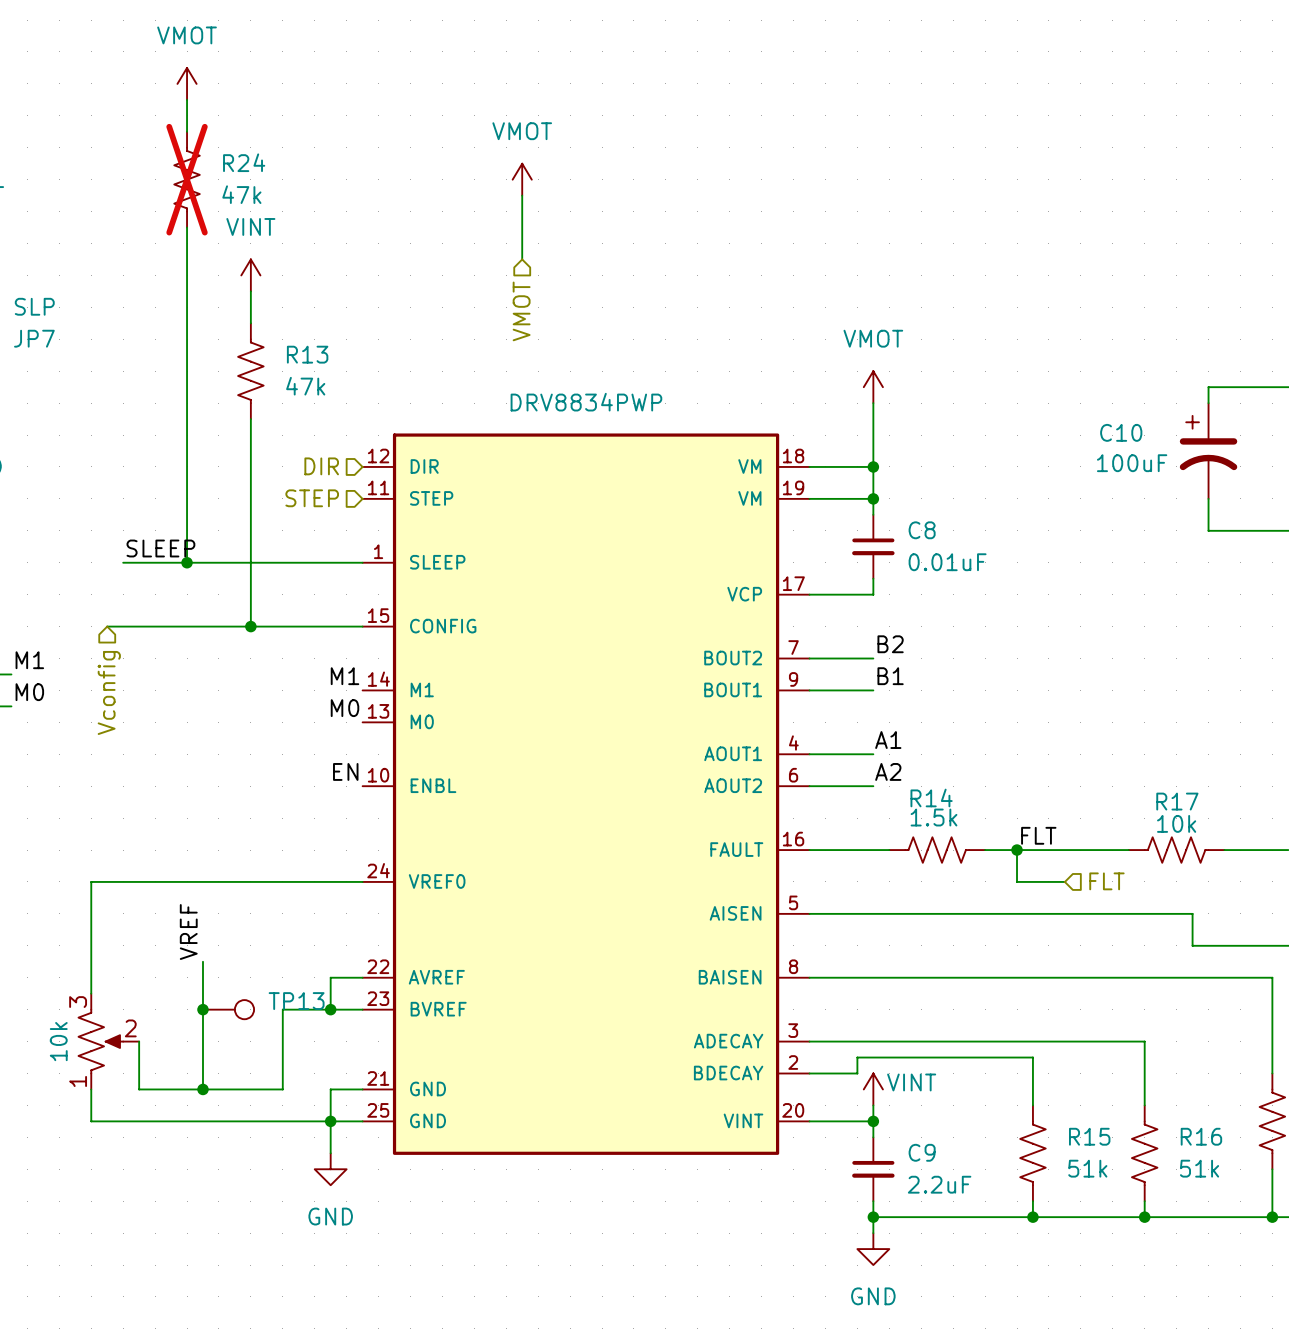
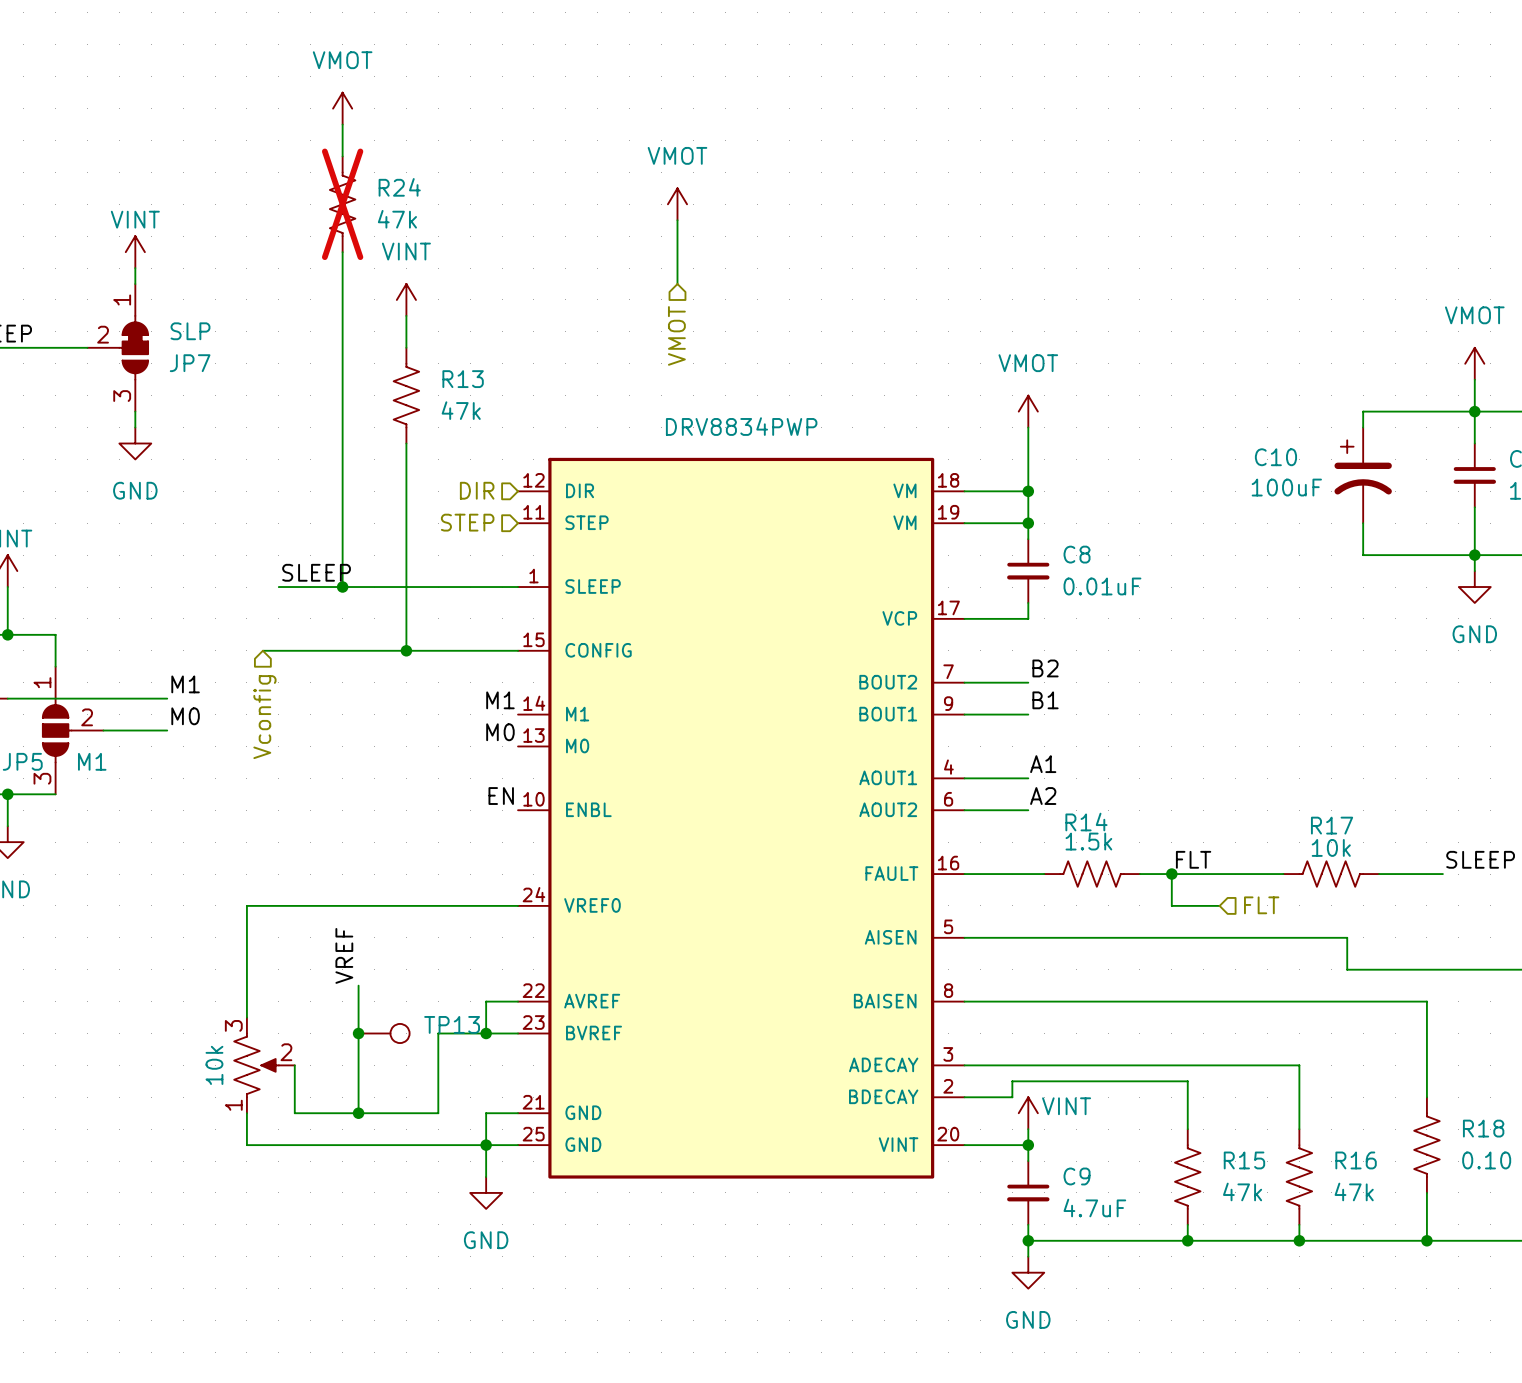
R15 value: 51k (1087, 1168) -> 47k (1242, 1191)
R16 value: 51k (1199, 1168) -> 47k (1354, 1191)
C9 value: 2.2uF (939, 1184) -> 4.7uF (1094, 1208)

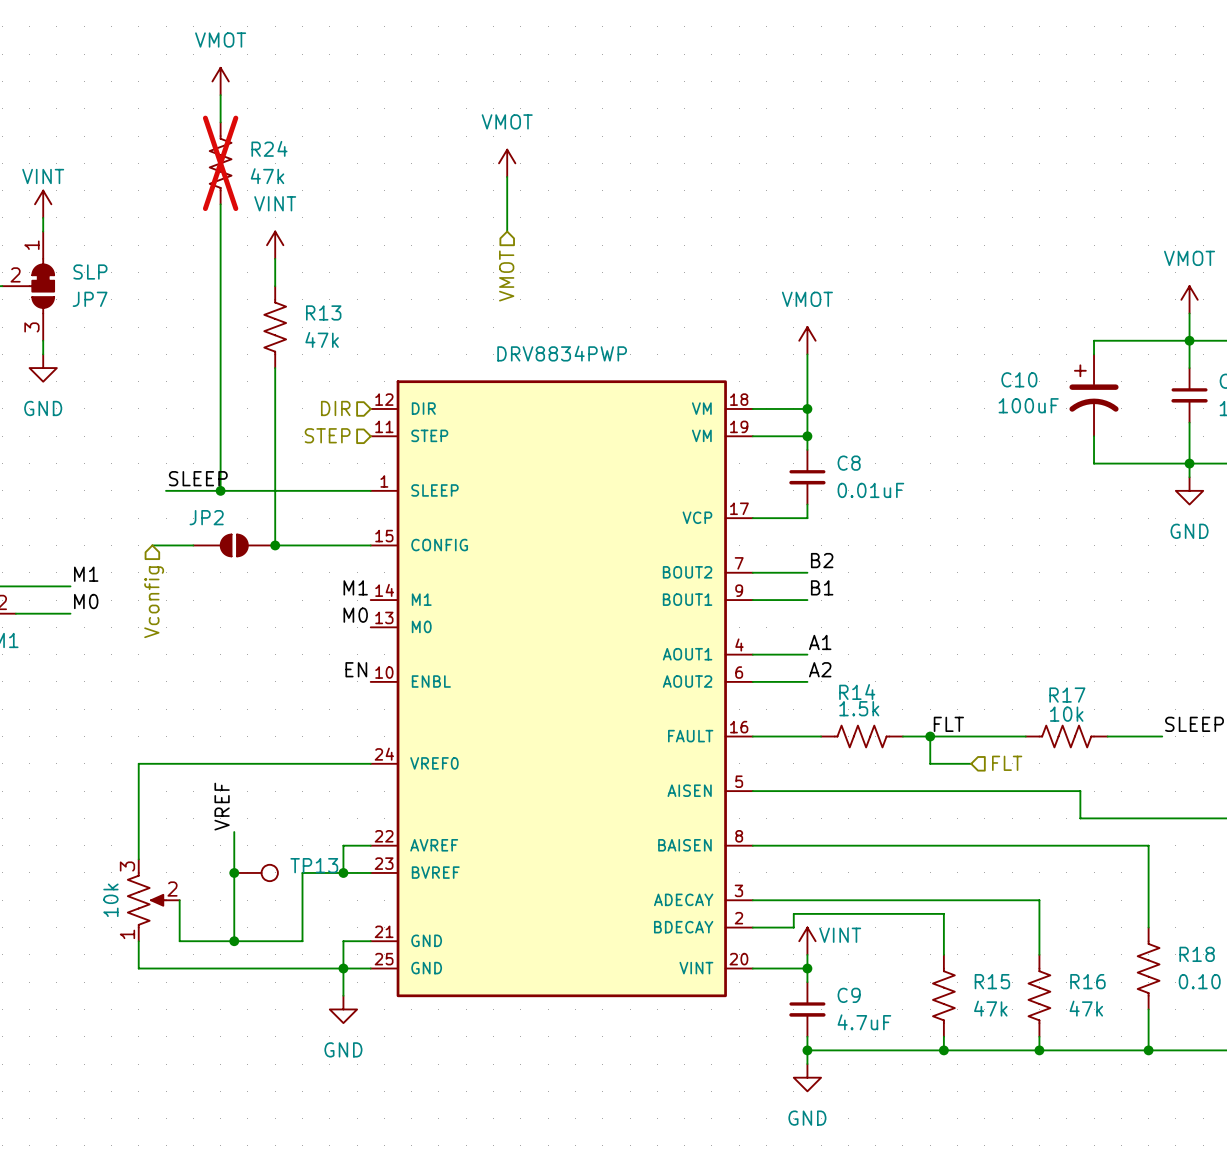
JP2: none -> (234, 545)

